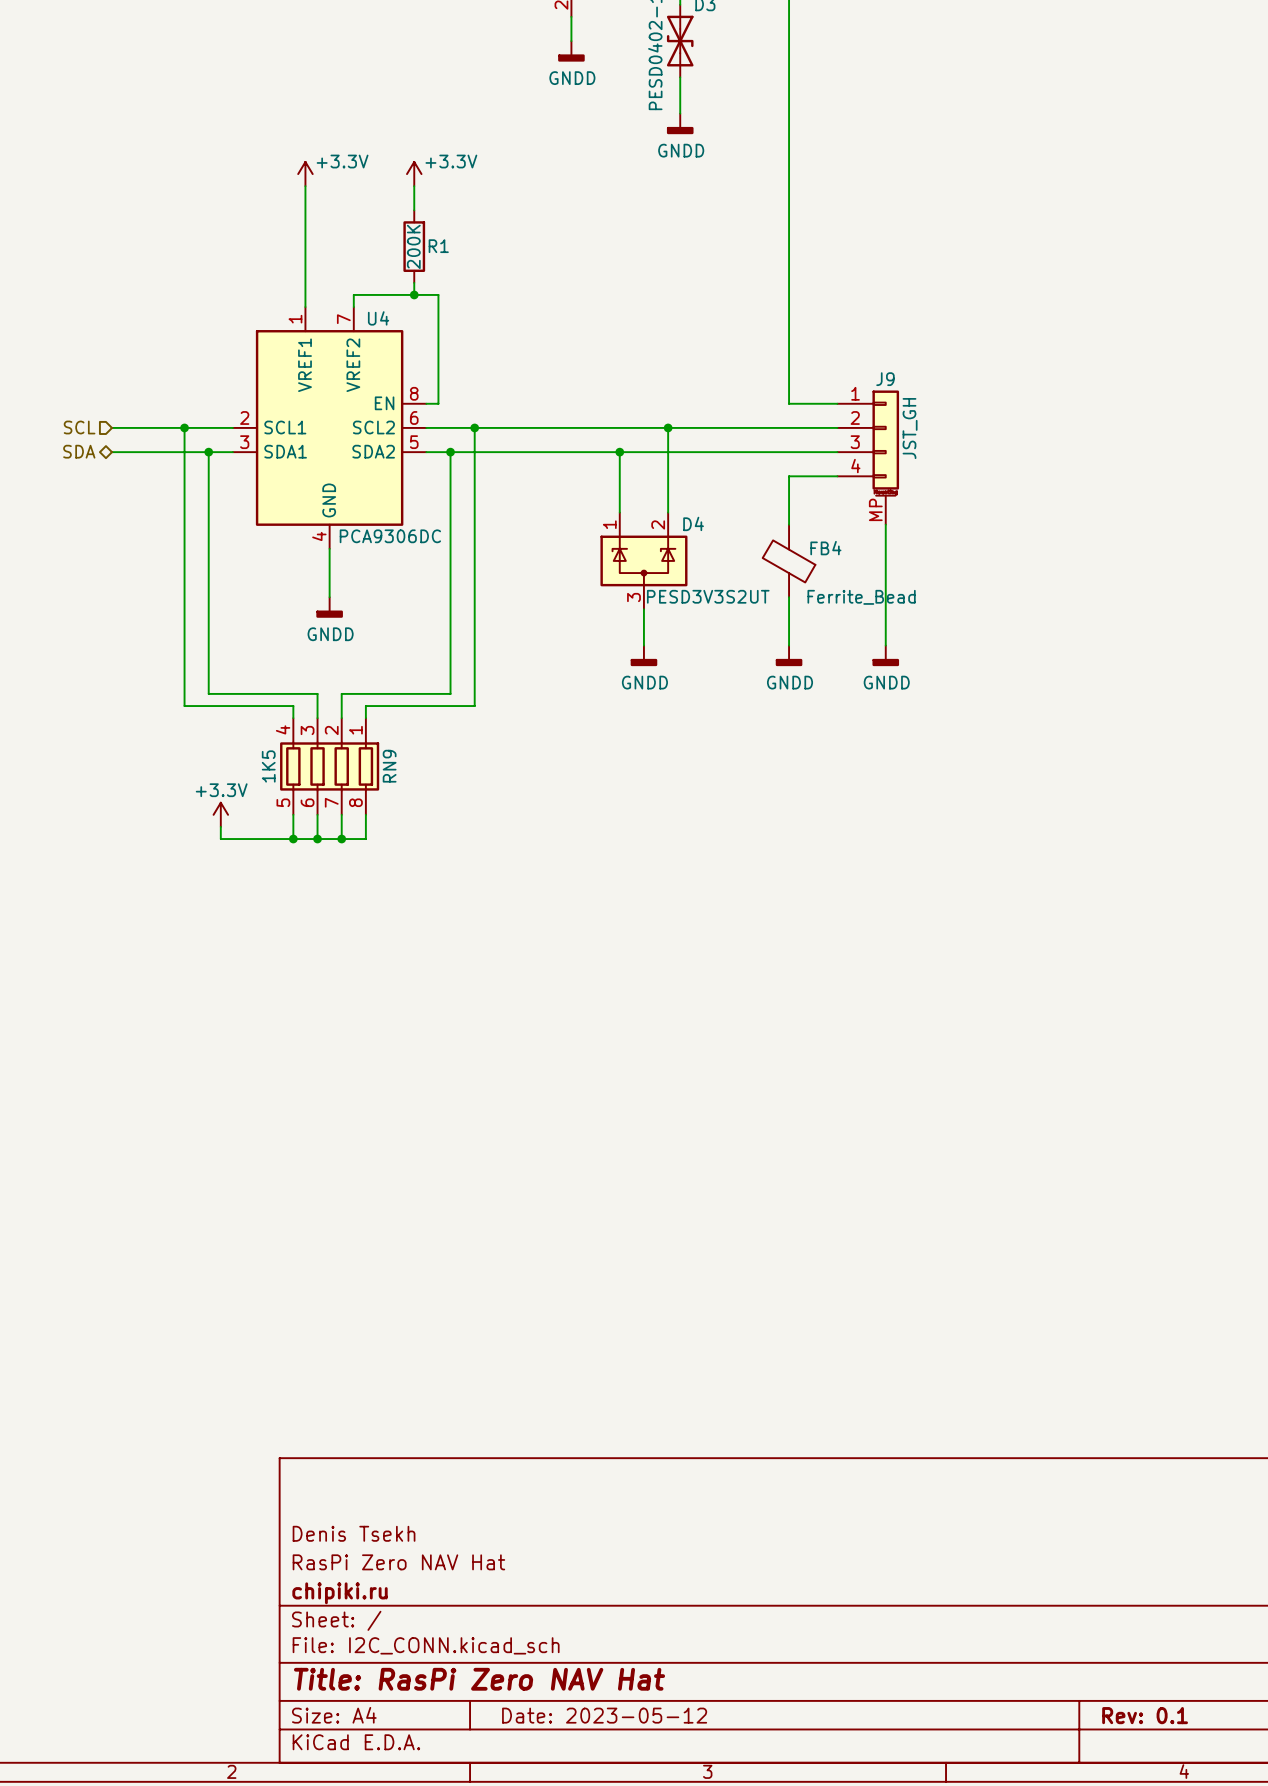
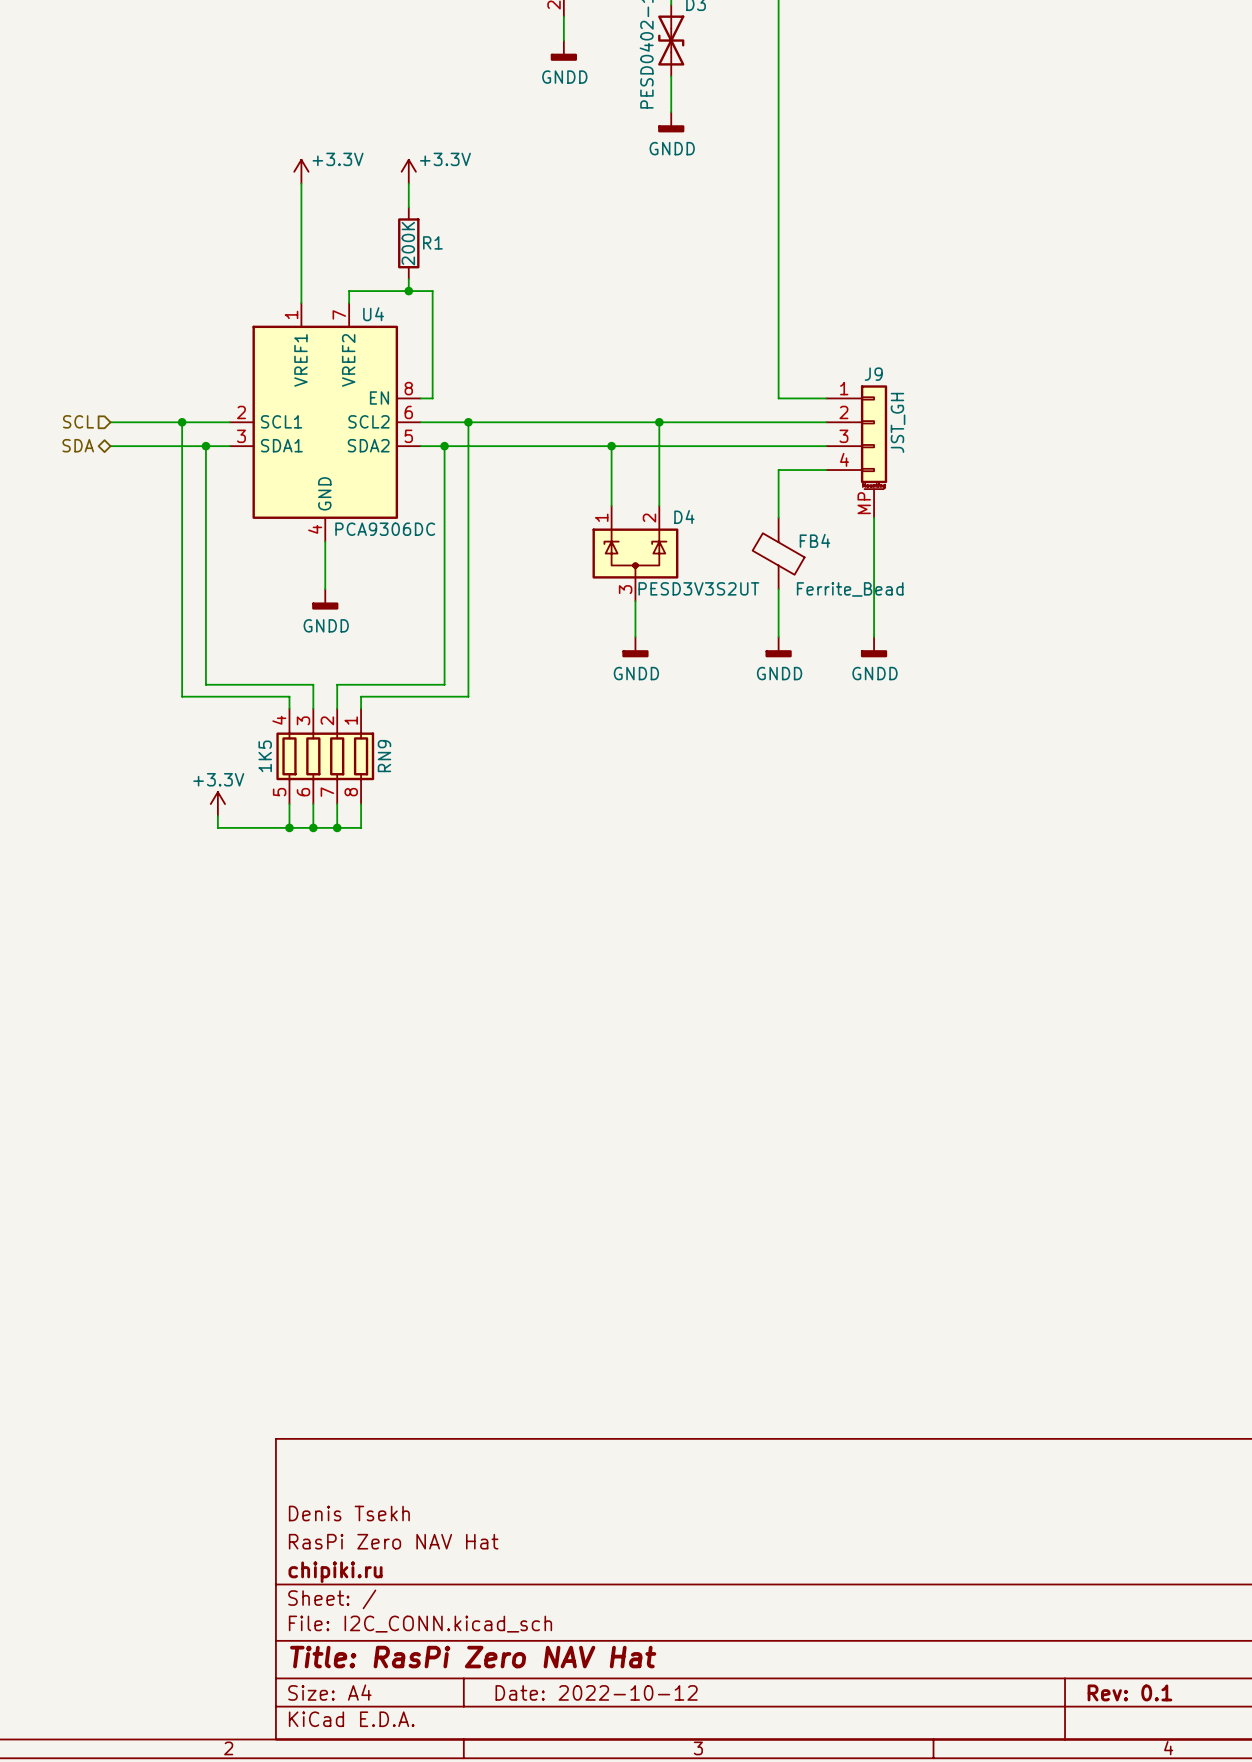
title block: Date: 2023-05-12 (604, 1715) -> Date: 2022-10-12 (596, 1692)

